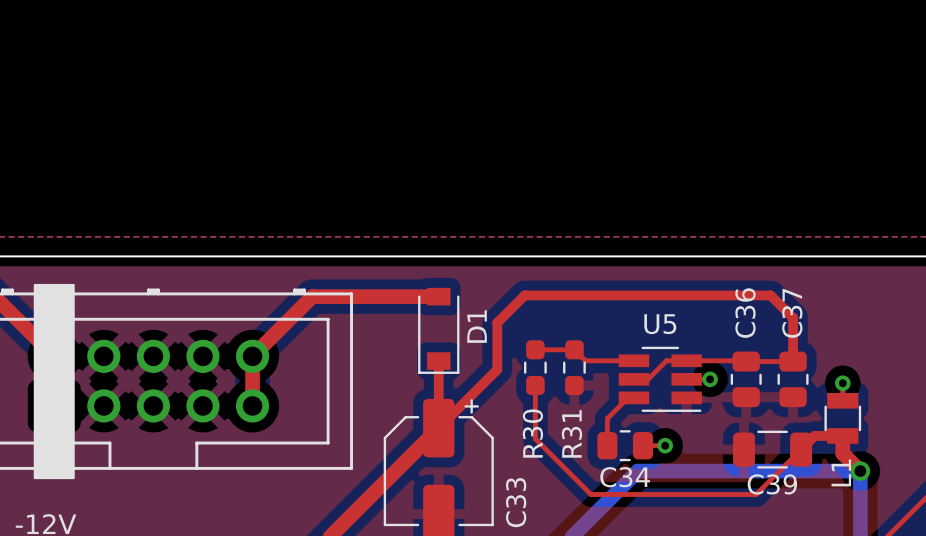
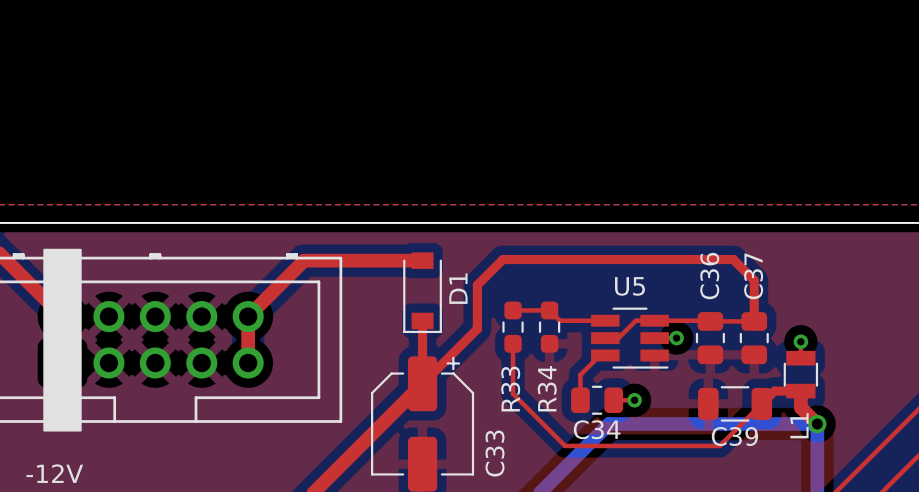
R30 name: R30 (532, 433) -> R33 (510, 389)
R31 name: R31 (571, 433) -> R34 (547, 388)

